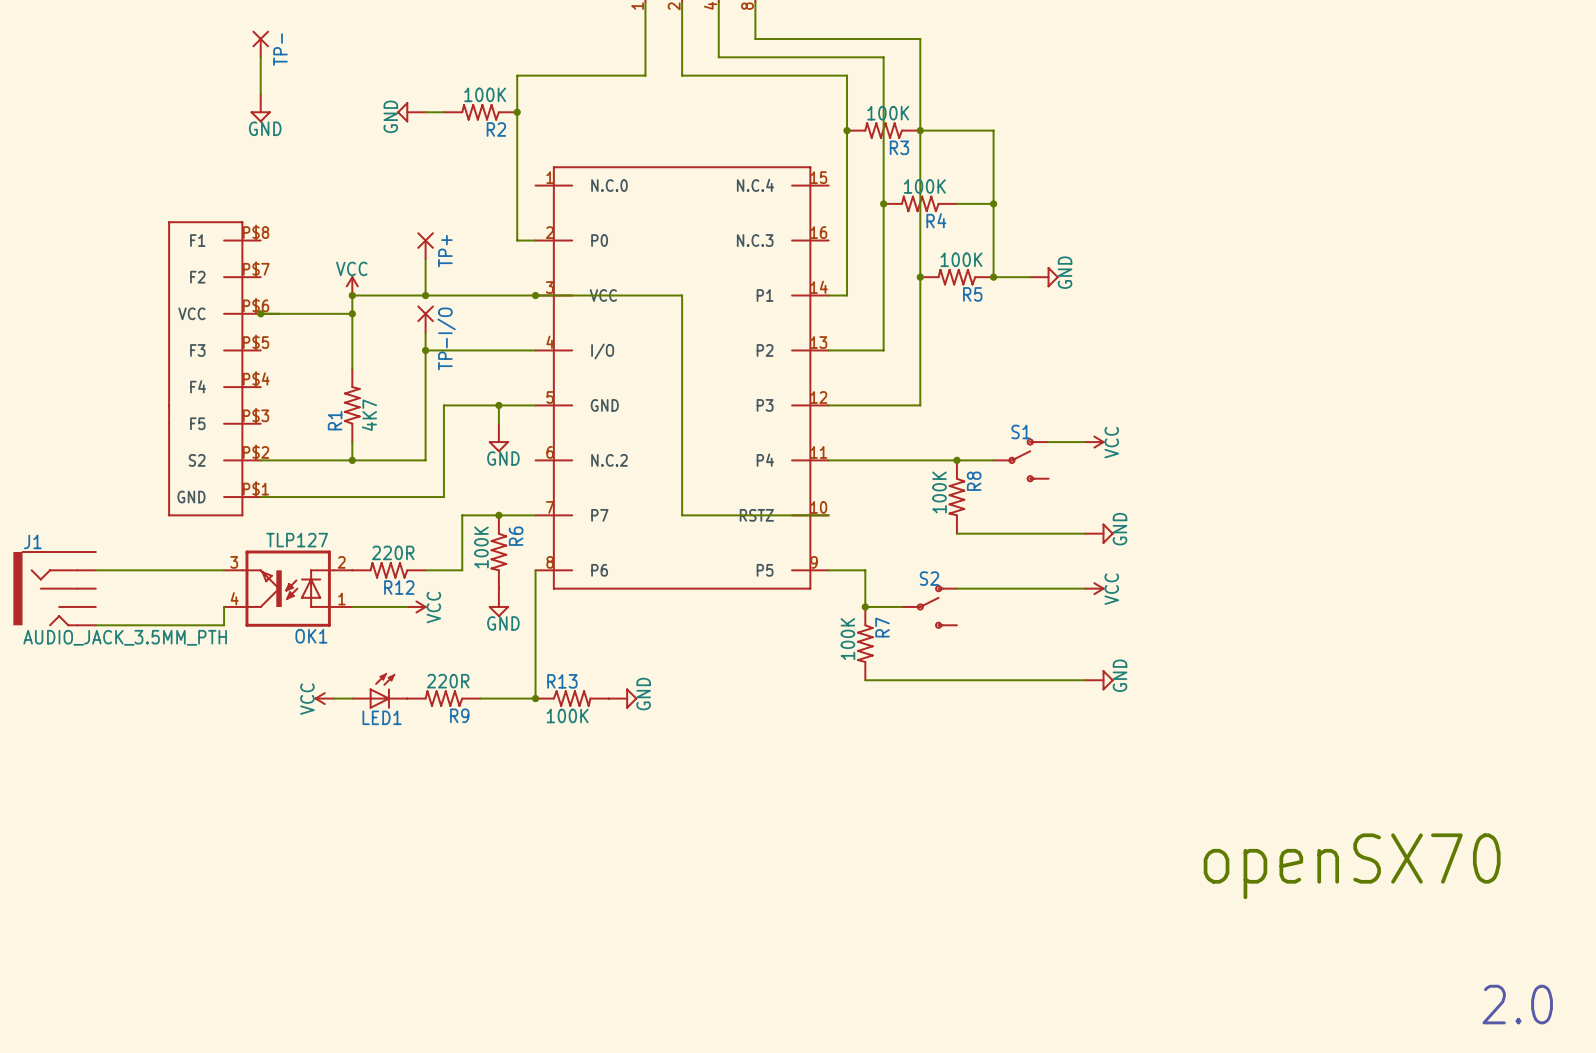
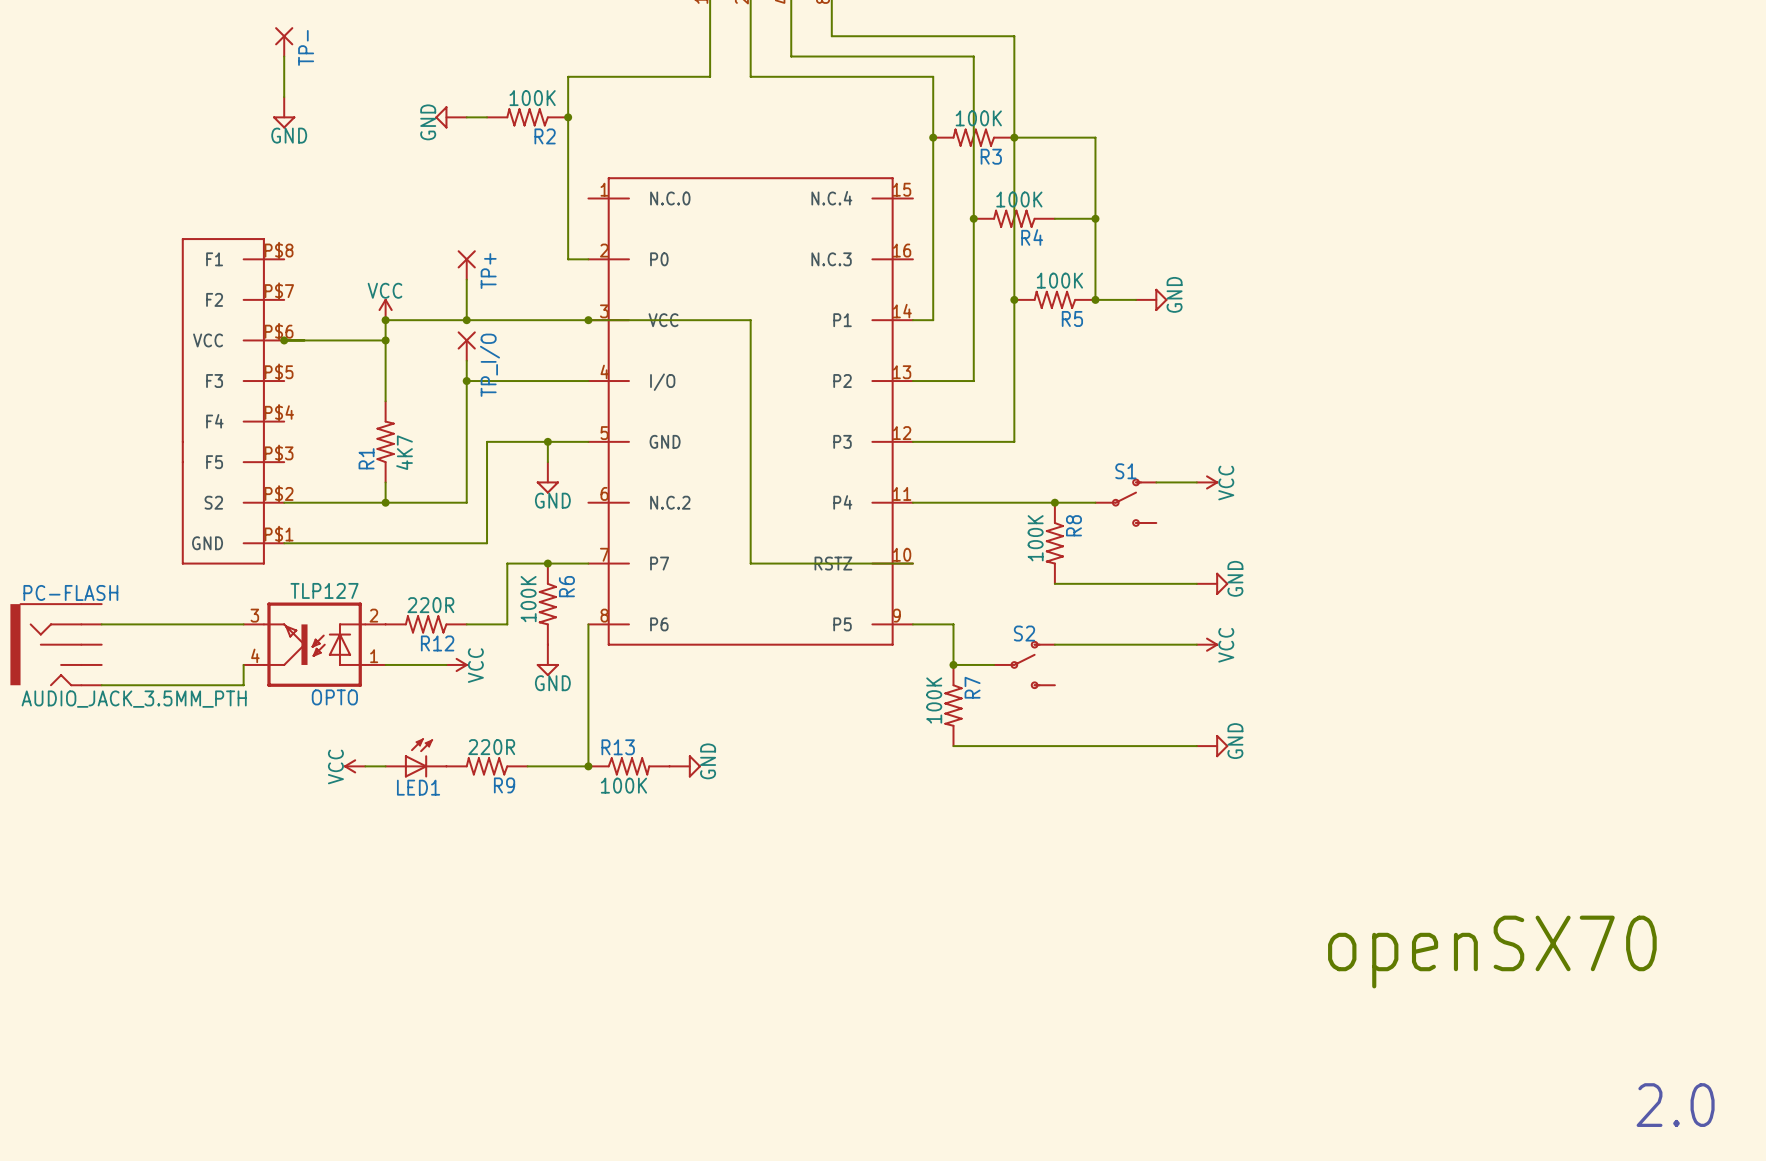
TP-I/O name: TP-I/O (446, 338) -> TP_I/O (489, 365)
J1 name: J1 (32, 541) -> PC-FLASH (70, 592)
OK1 name: OK1 (311, 636) -> OPTO (334, 697)

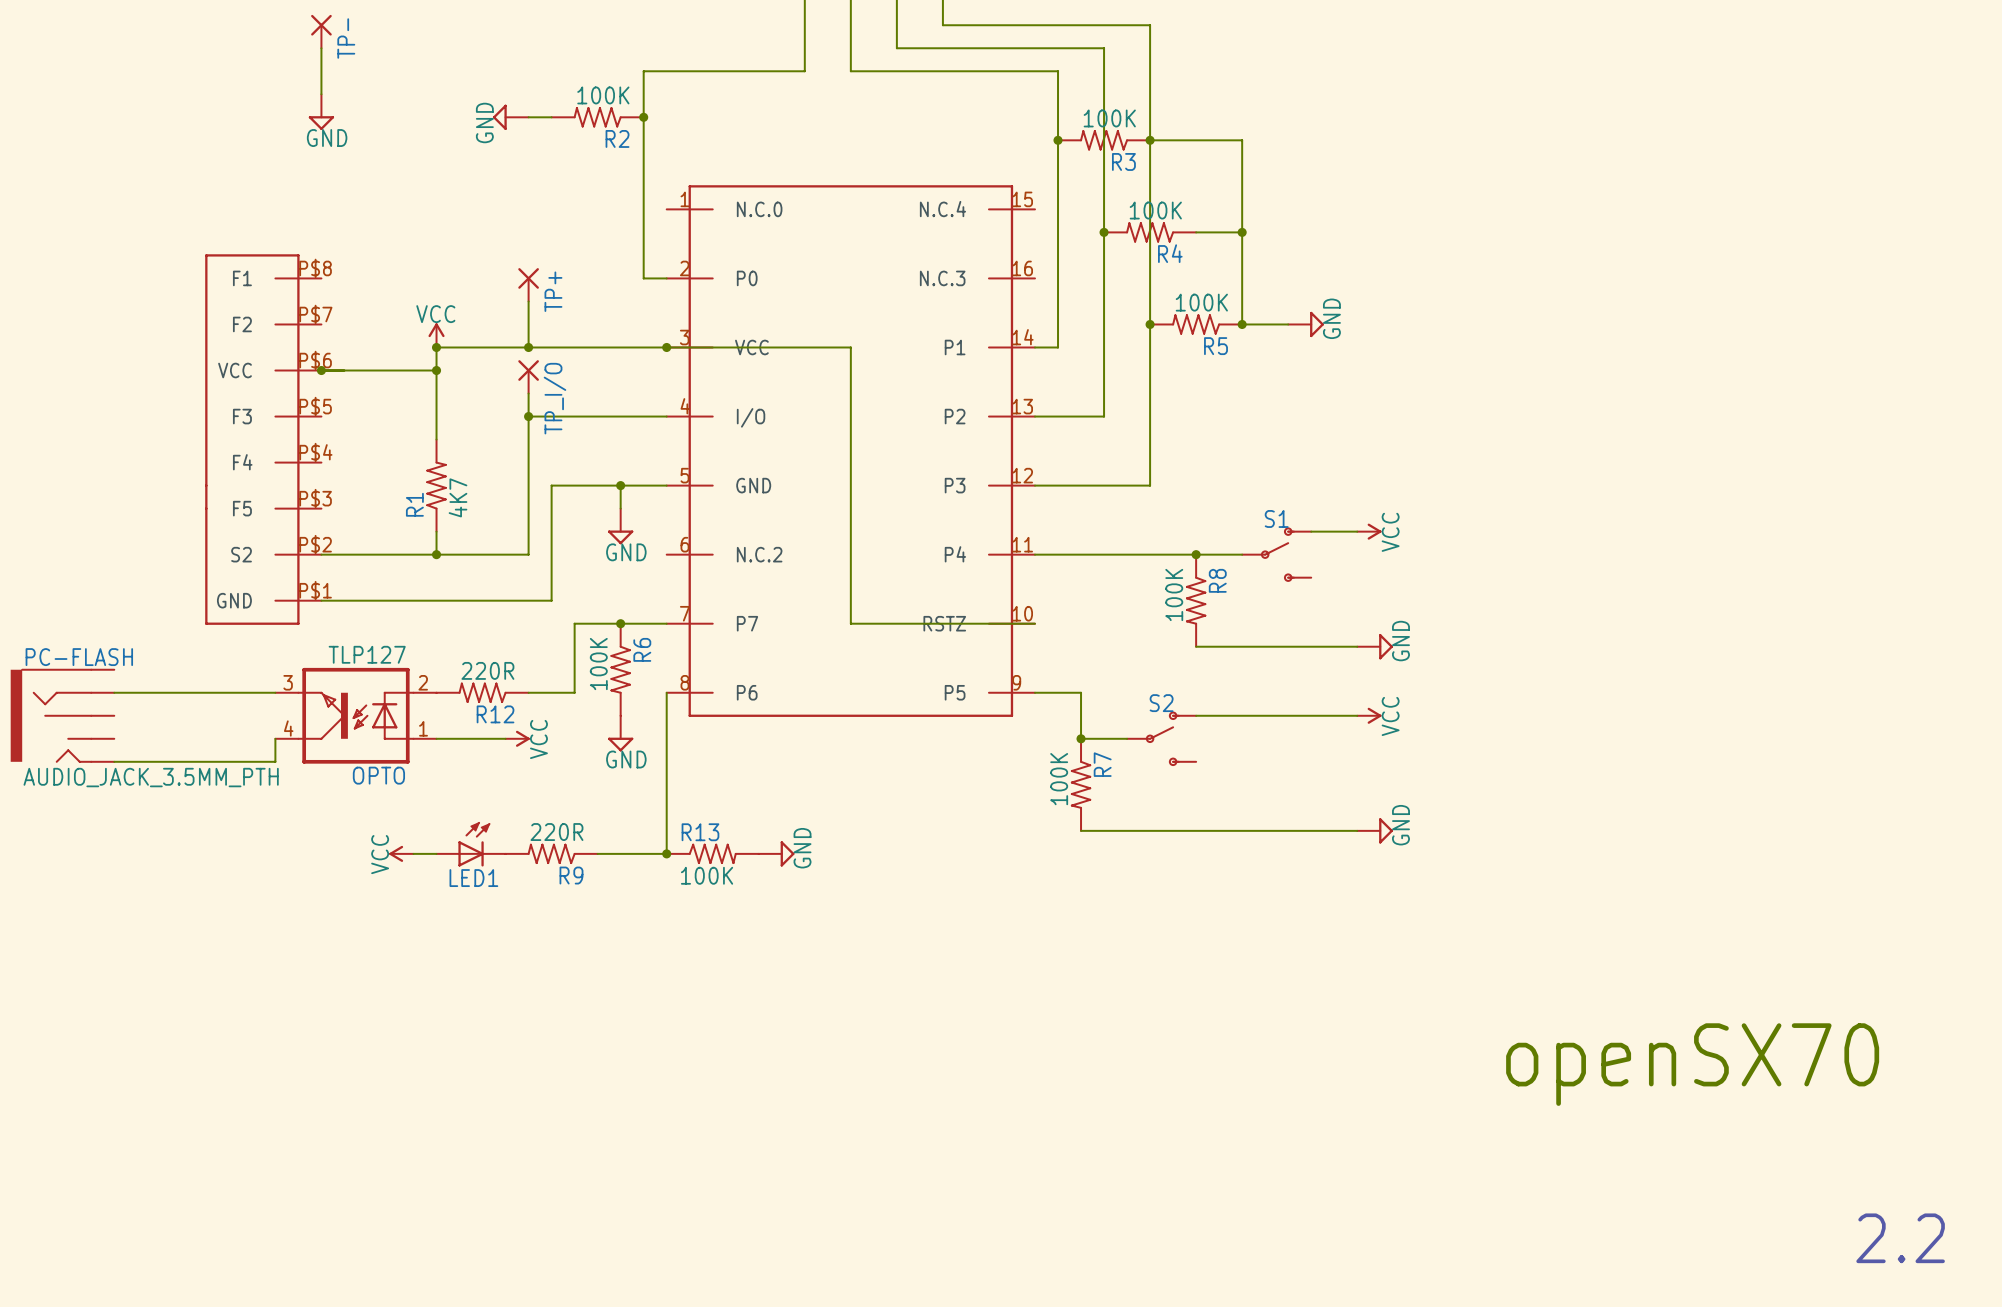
text: 2.0 (1675, 1105) -> 2.2 (1900, 1238)

